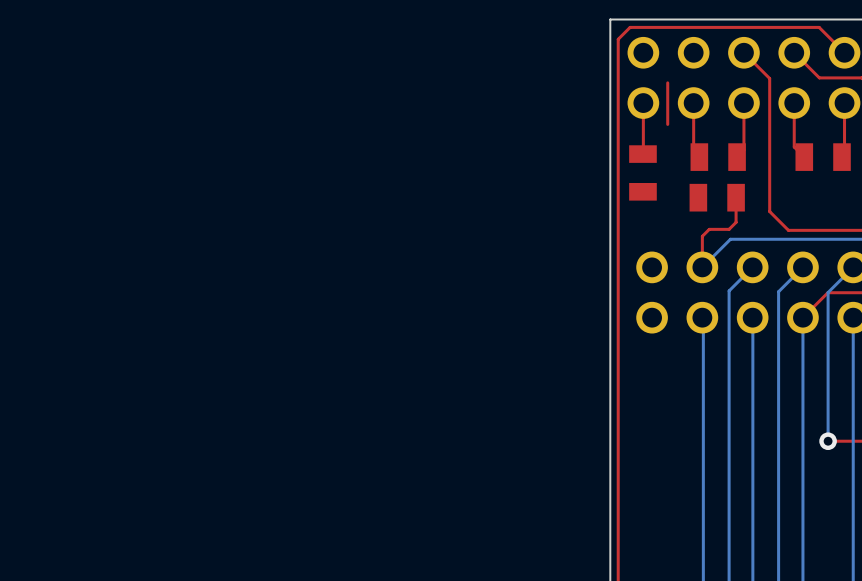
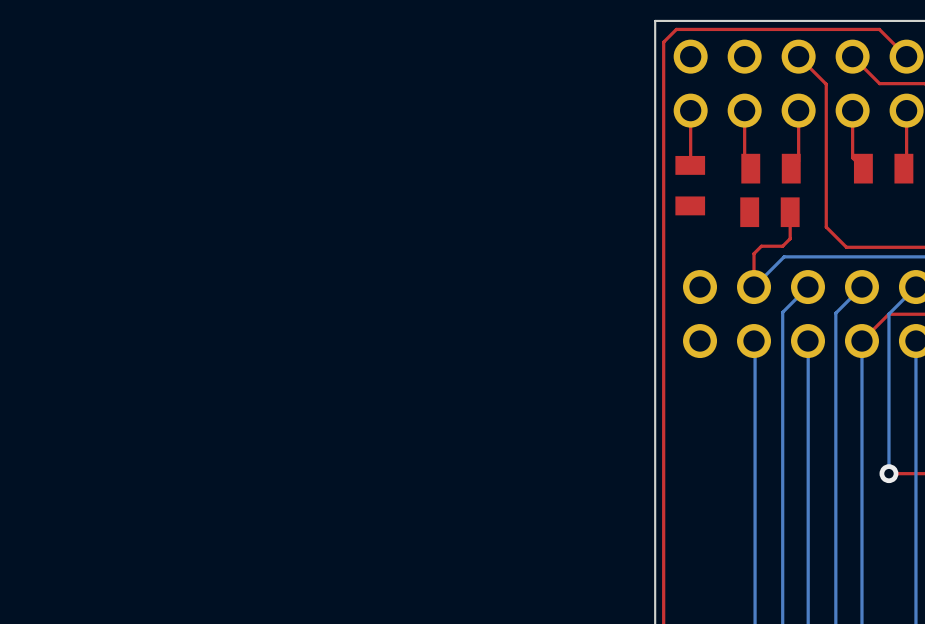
top track: (667, 82) (667, 124) -> none

